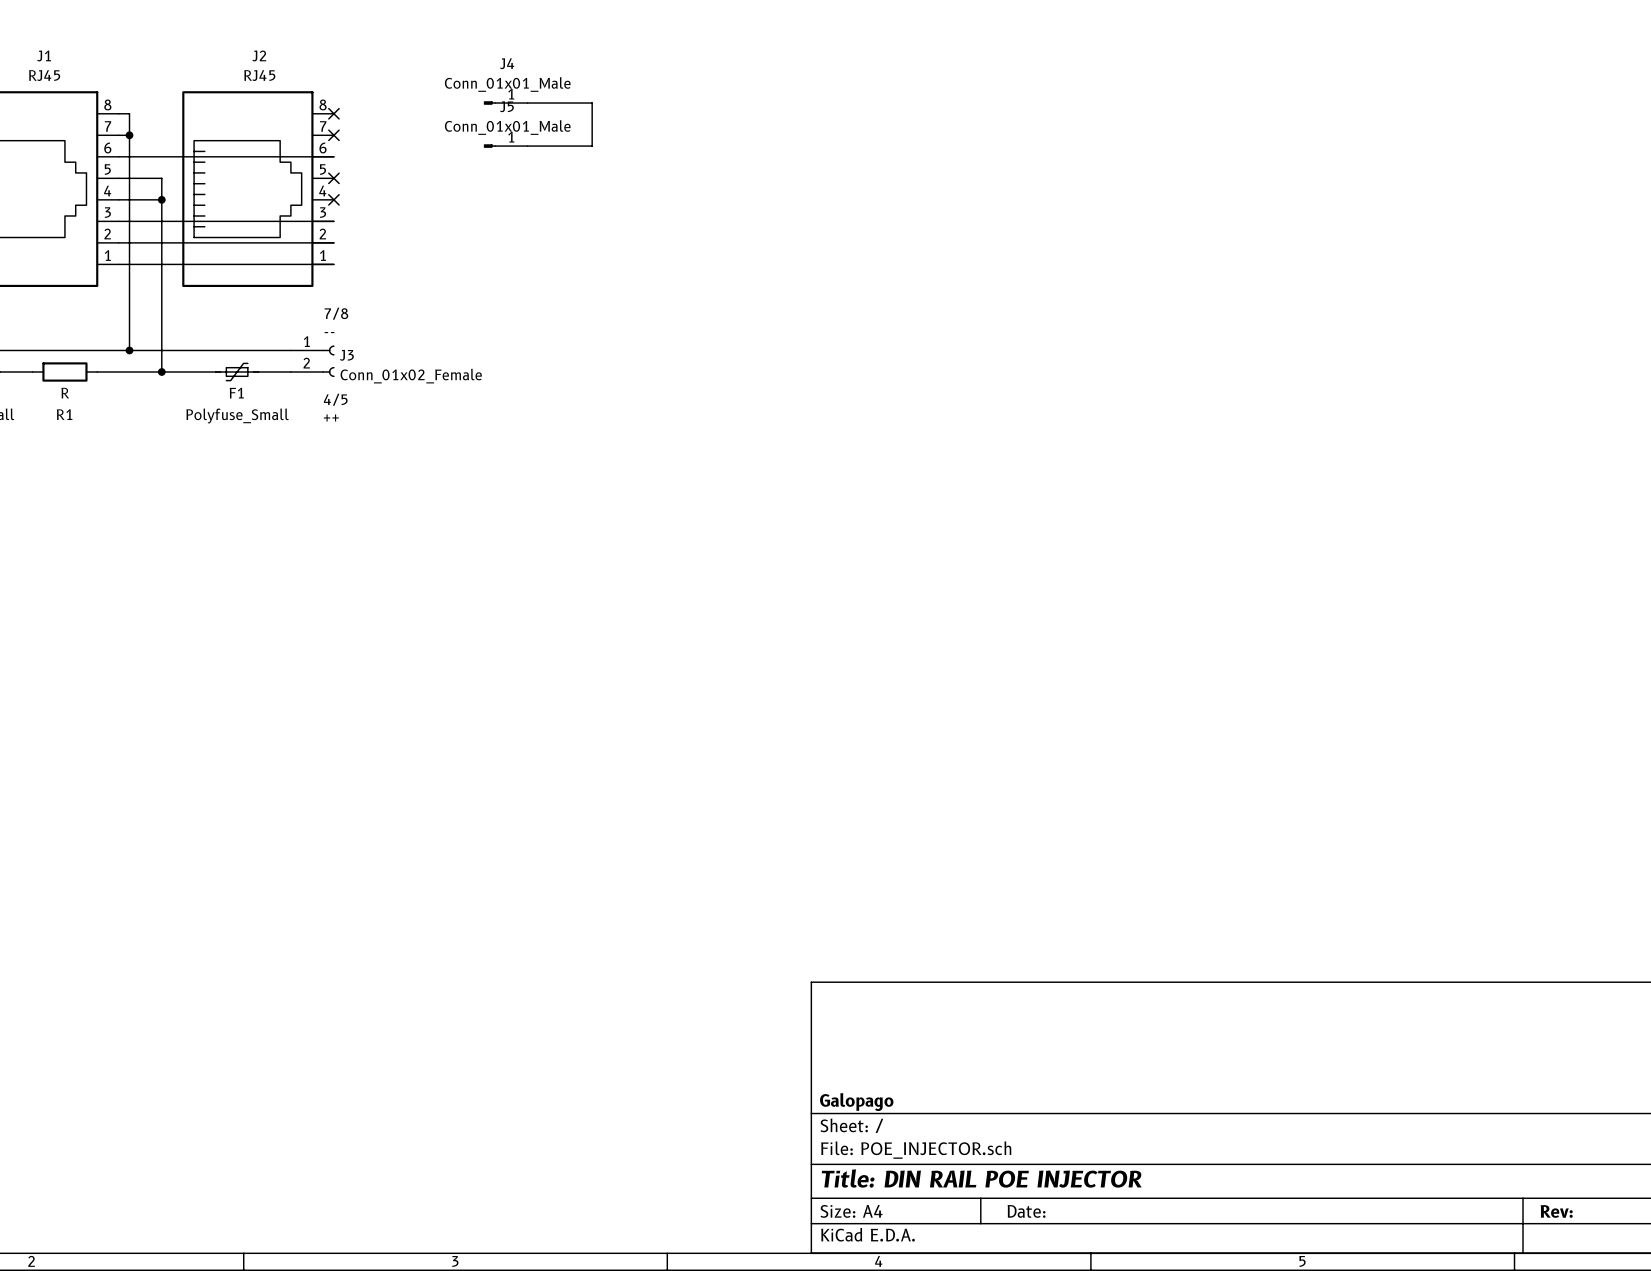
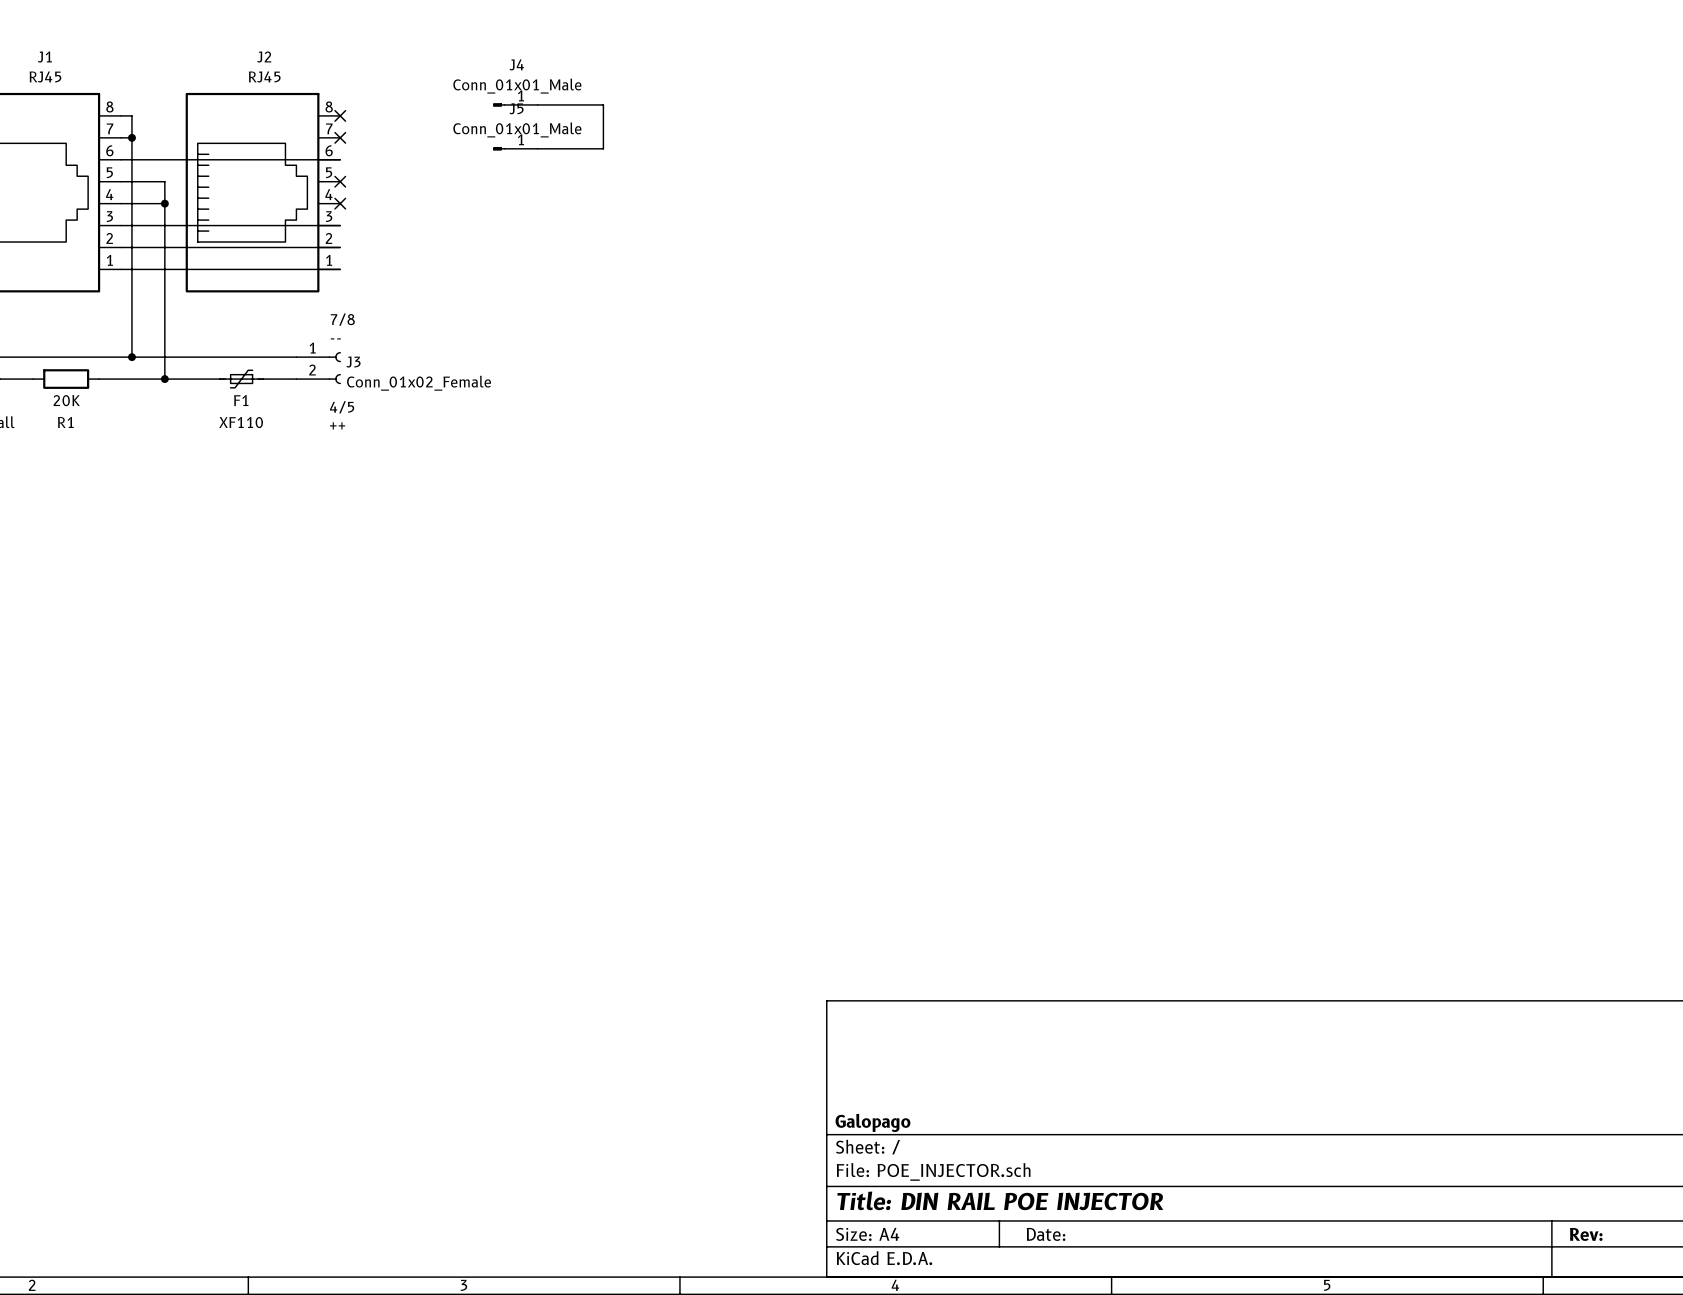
R1 value: R (65, 393) -> 20K (66, 400)
F1 value: Polyfuse_Small (237, 415) -> XF110 (241, 422)

